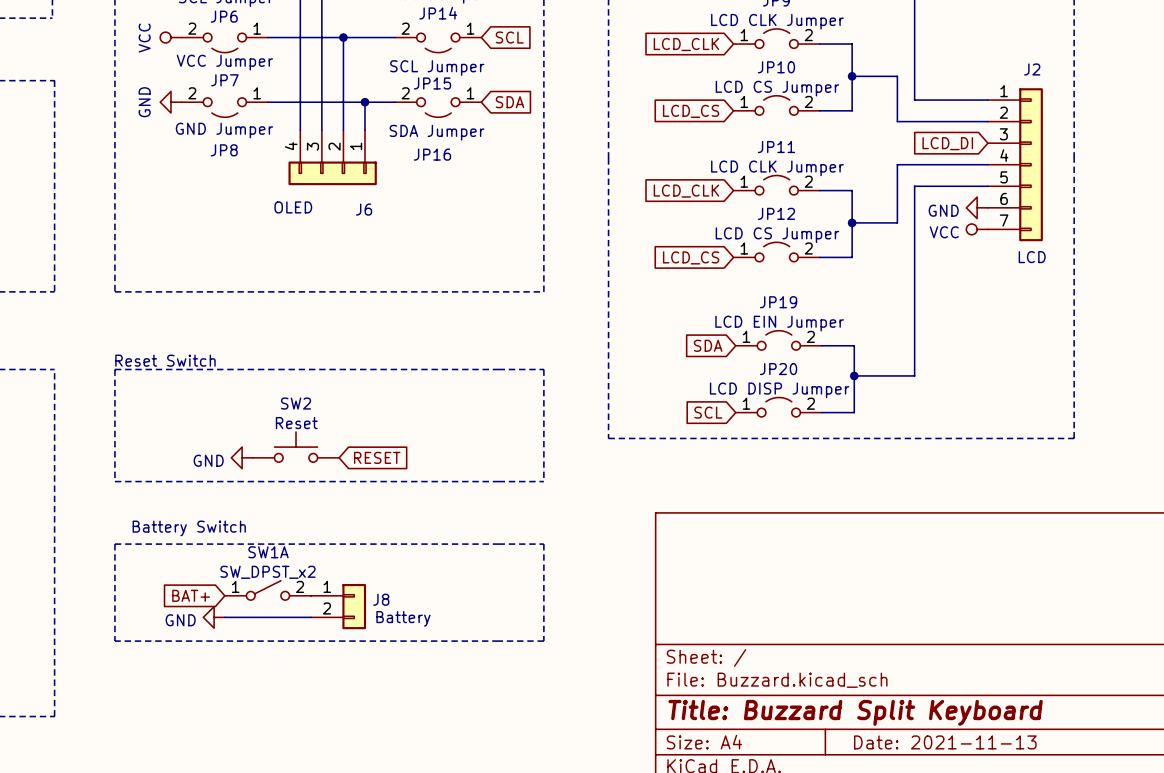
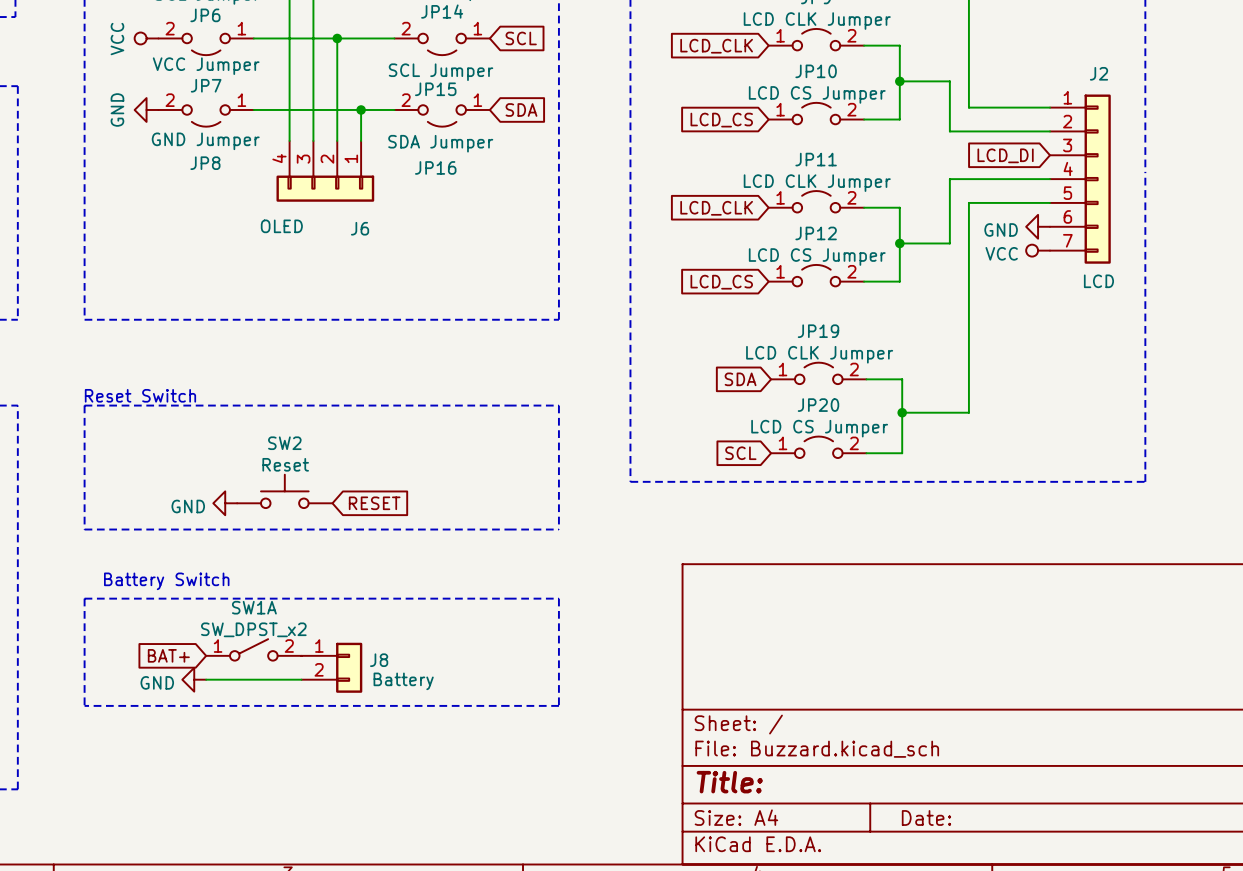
JP19 value: LCD EIN Jumper (779, 323) -> LCD CLK Jumper (819, 354)
JP20 value: LCD DISP Jumper (779, 390) -> LCD CS Jumper (819, 428)
title block: Title: Buzzard Split Keyboard (855, 712) -> Title: (729, 782)
title block: Date: 2021-11-13 (945, 742) -> Date: (926, 817)

